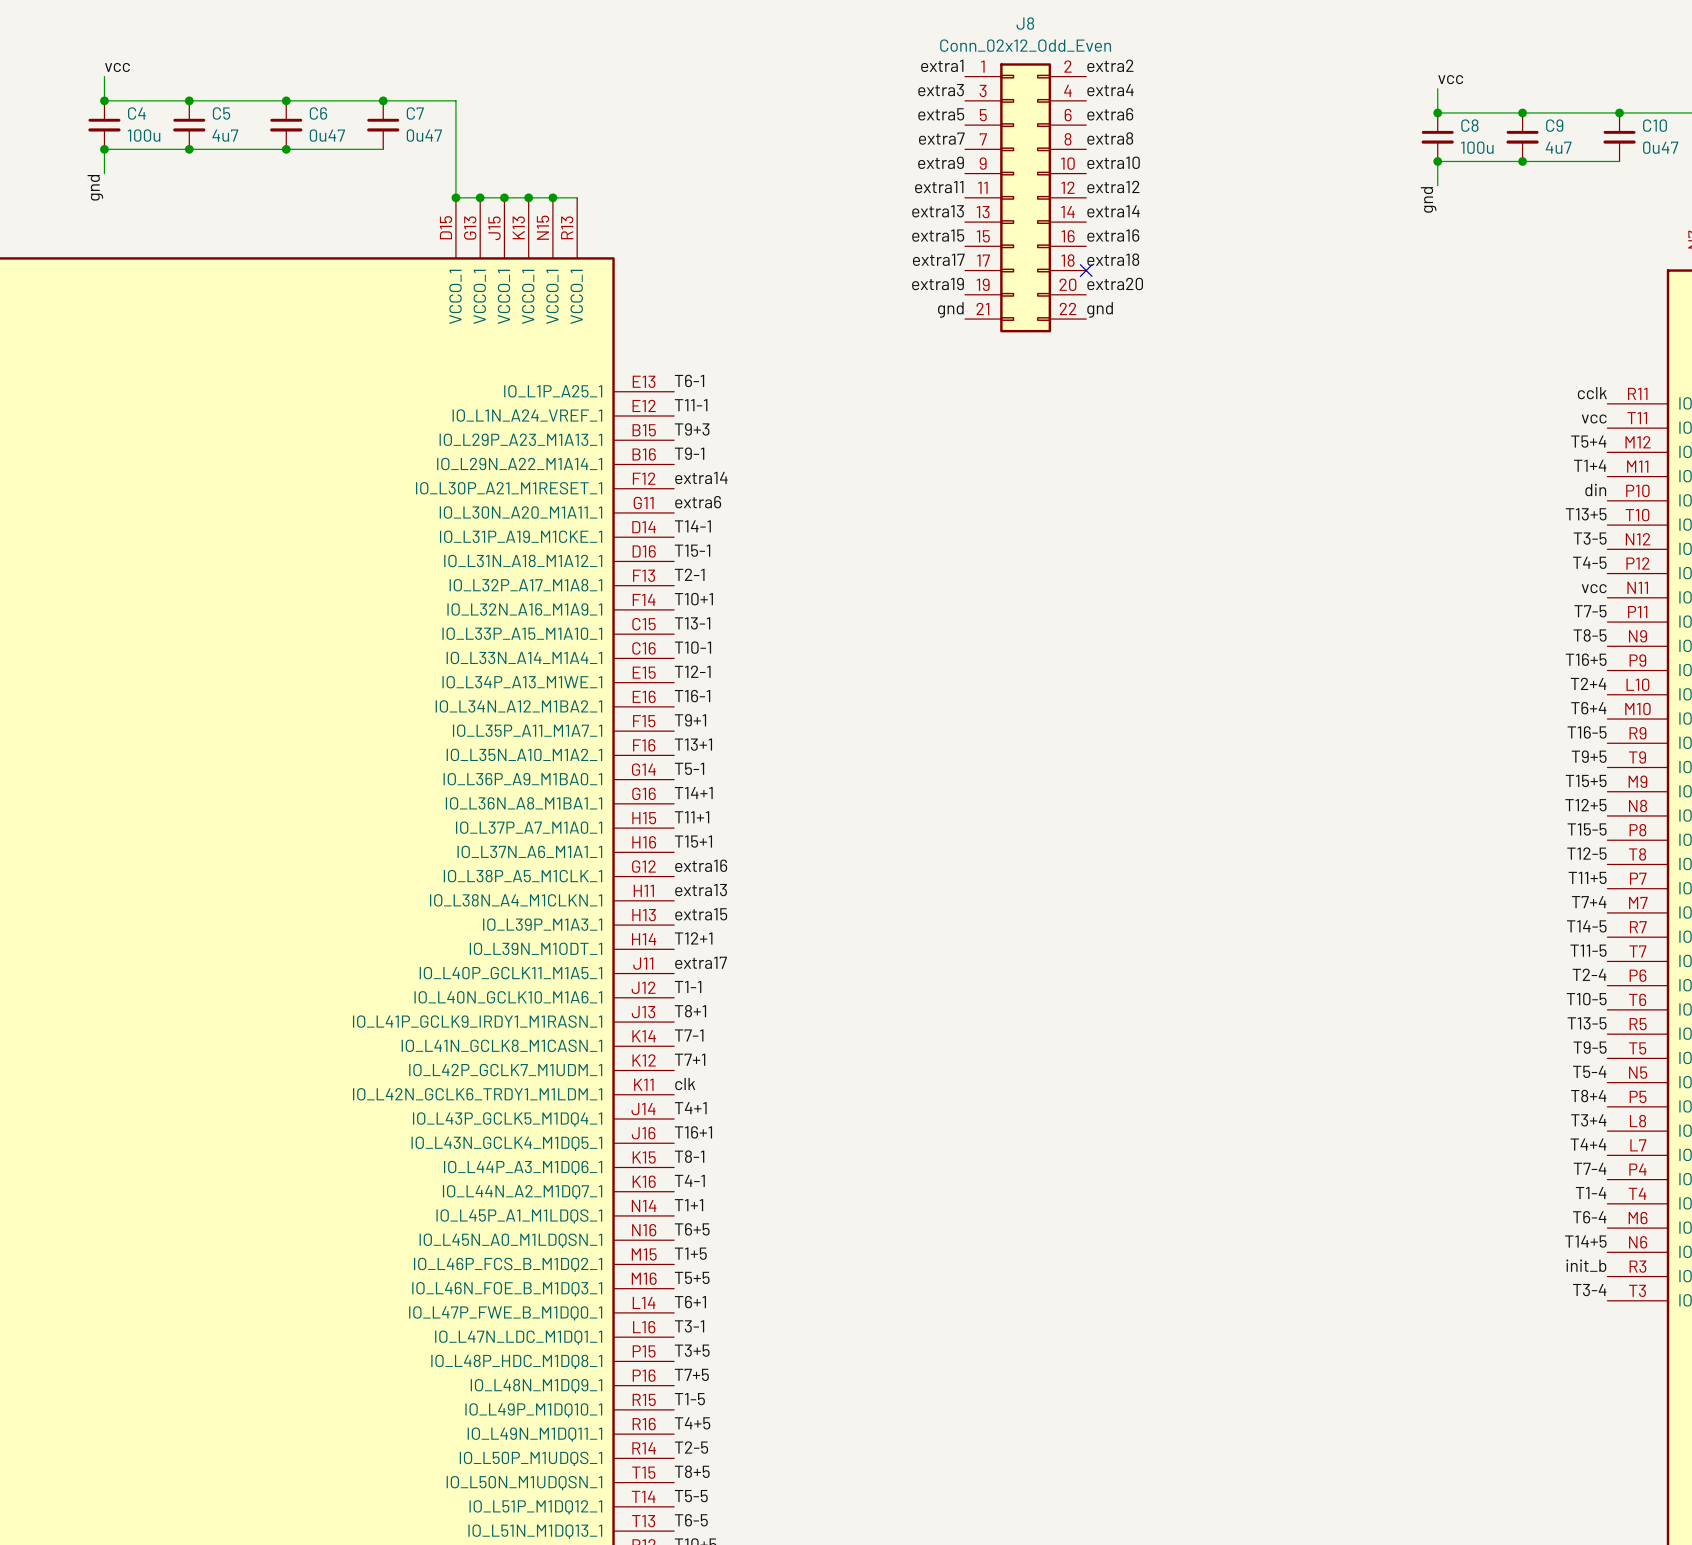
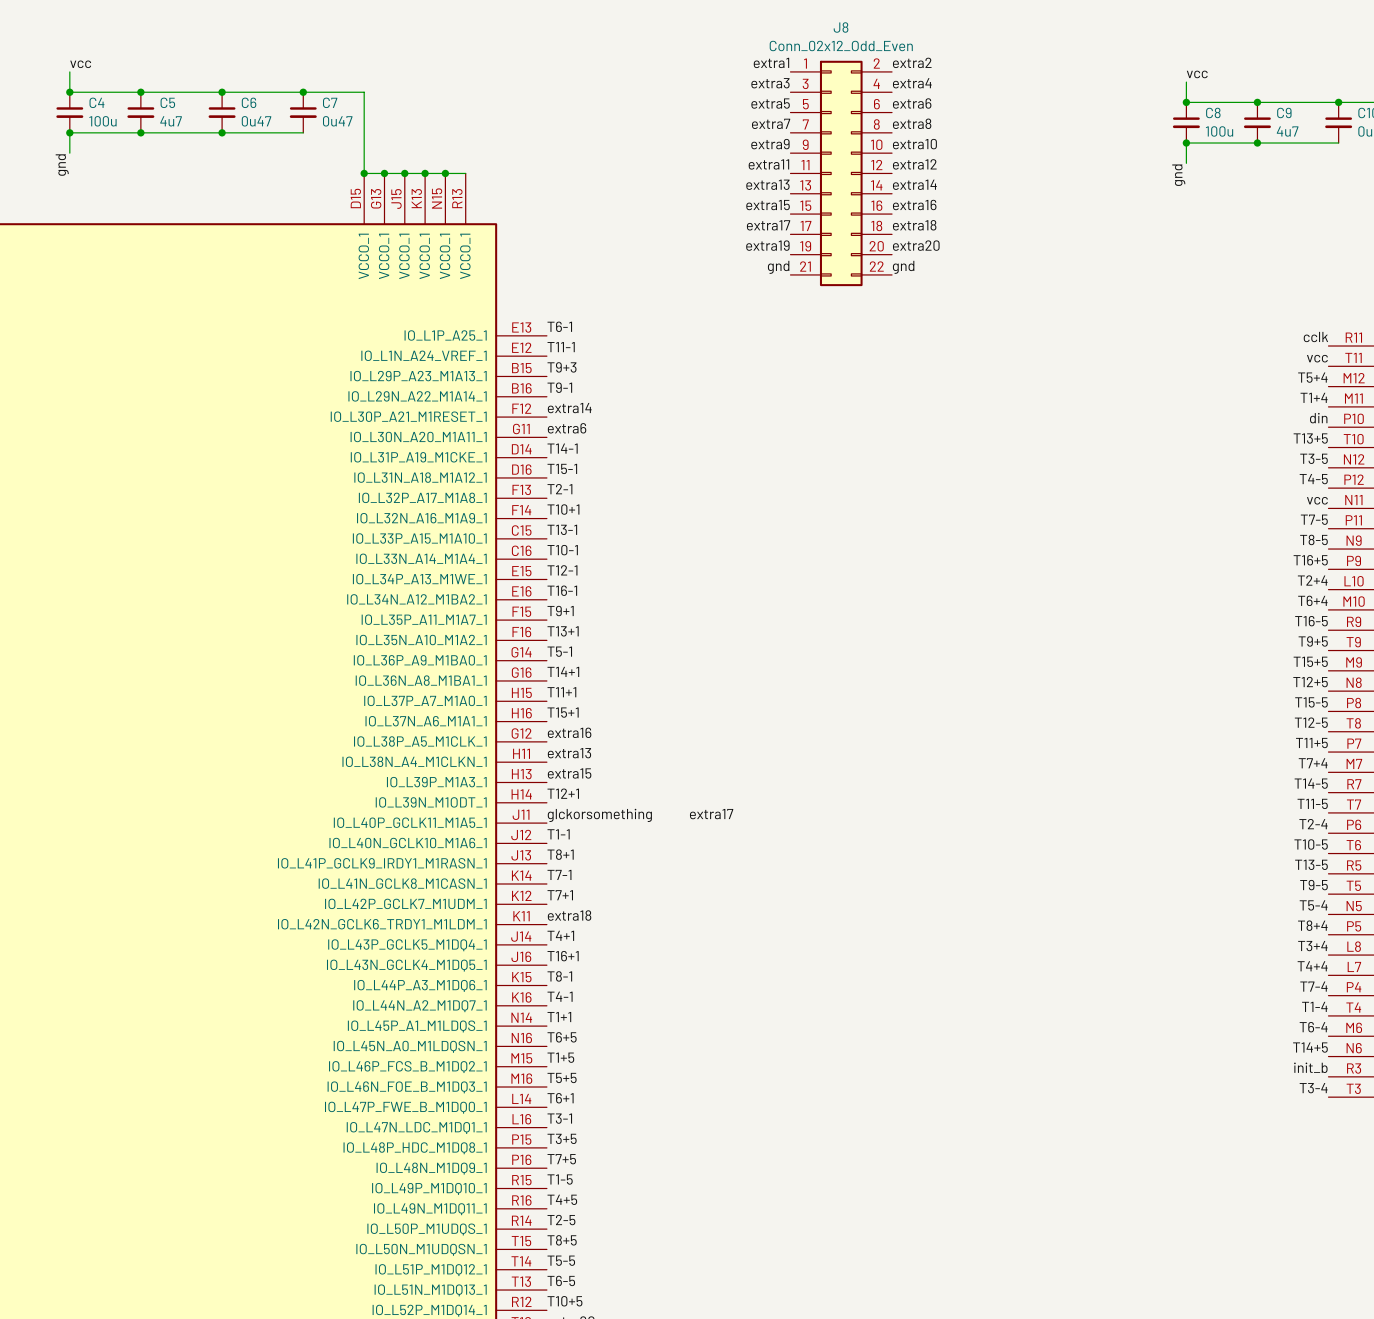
no-connect mark: (1086, 270) -> none
label: extra17 (701, 962) -> glckorsomething (599, 815)
label: none -> extra17 (711, 814)
label: clk (685, 1084) -> extra18 (569, 915)

